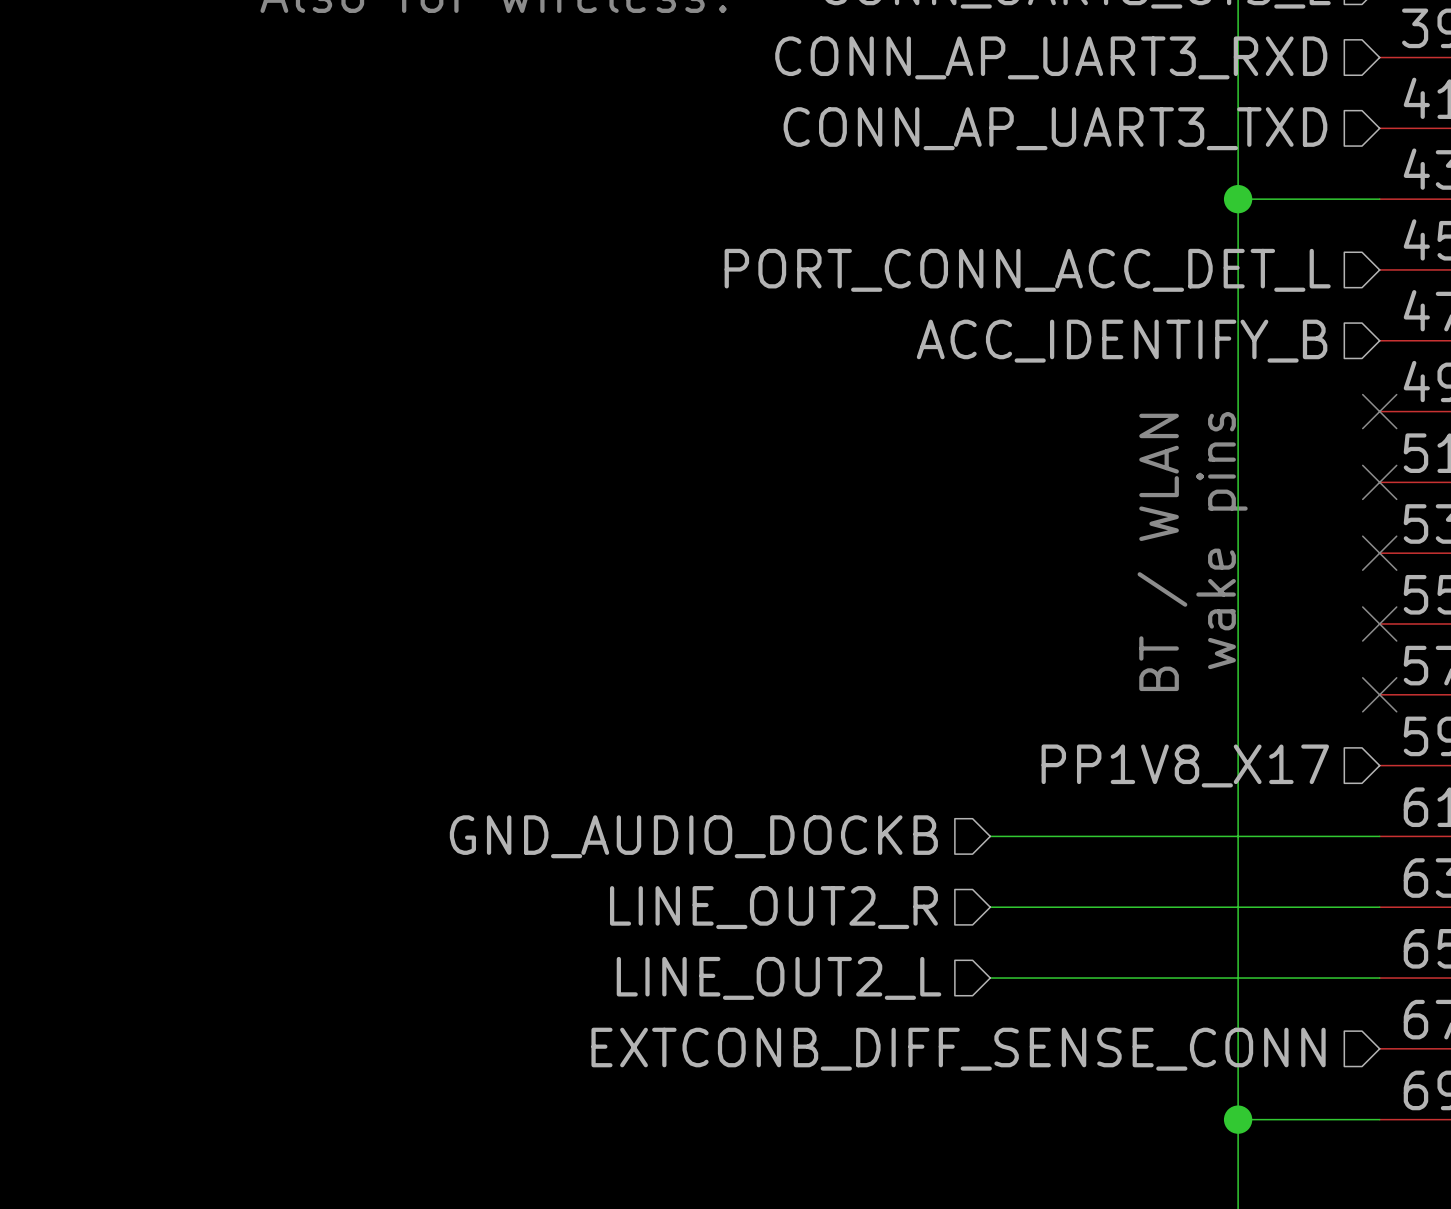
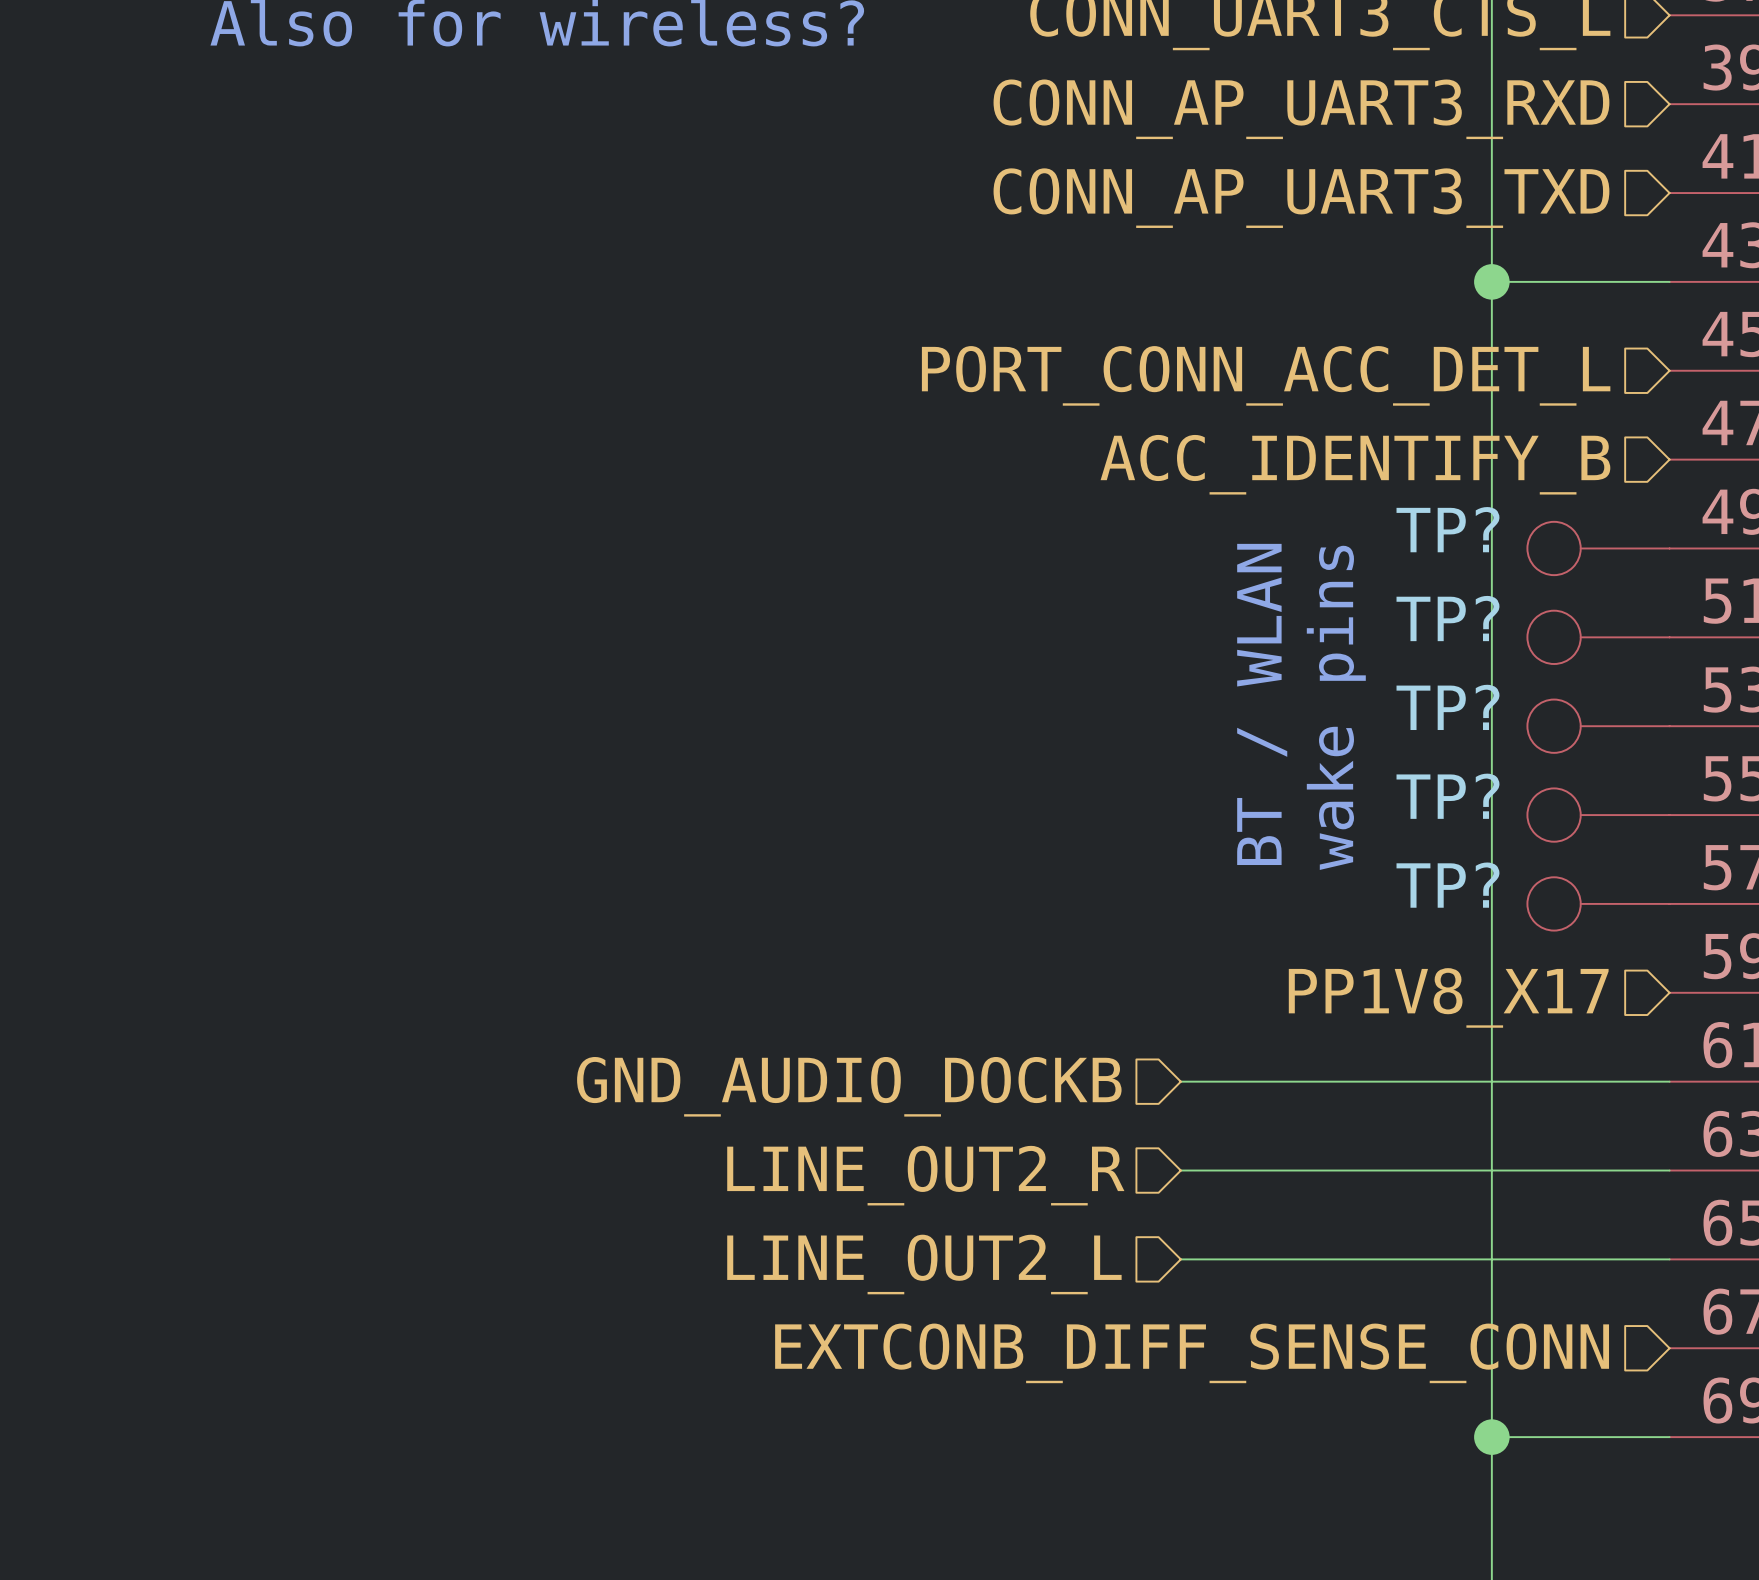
TP?: none -> (1598, 548)
no-connect mark: (1379, 411) -> none
TP?: none -> (1598, 637)
no-connect mark: (1379, 482) -> none
text position: wake pins (1221, 540) -> wake pins (1336, 707)
text position: BT / WLAN (1162, 552) -> BT / WLAN (1262, 704)
TP?: none -> (1598, 726)
no-connect mark: (1379, 553) -> none
TP?: none -> (1598, 815)
no-connect mark: (1379, 623) -> none
TP?: none -> (1598, 903)
no-connect mark: (1379, 694) -> none

